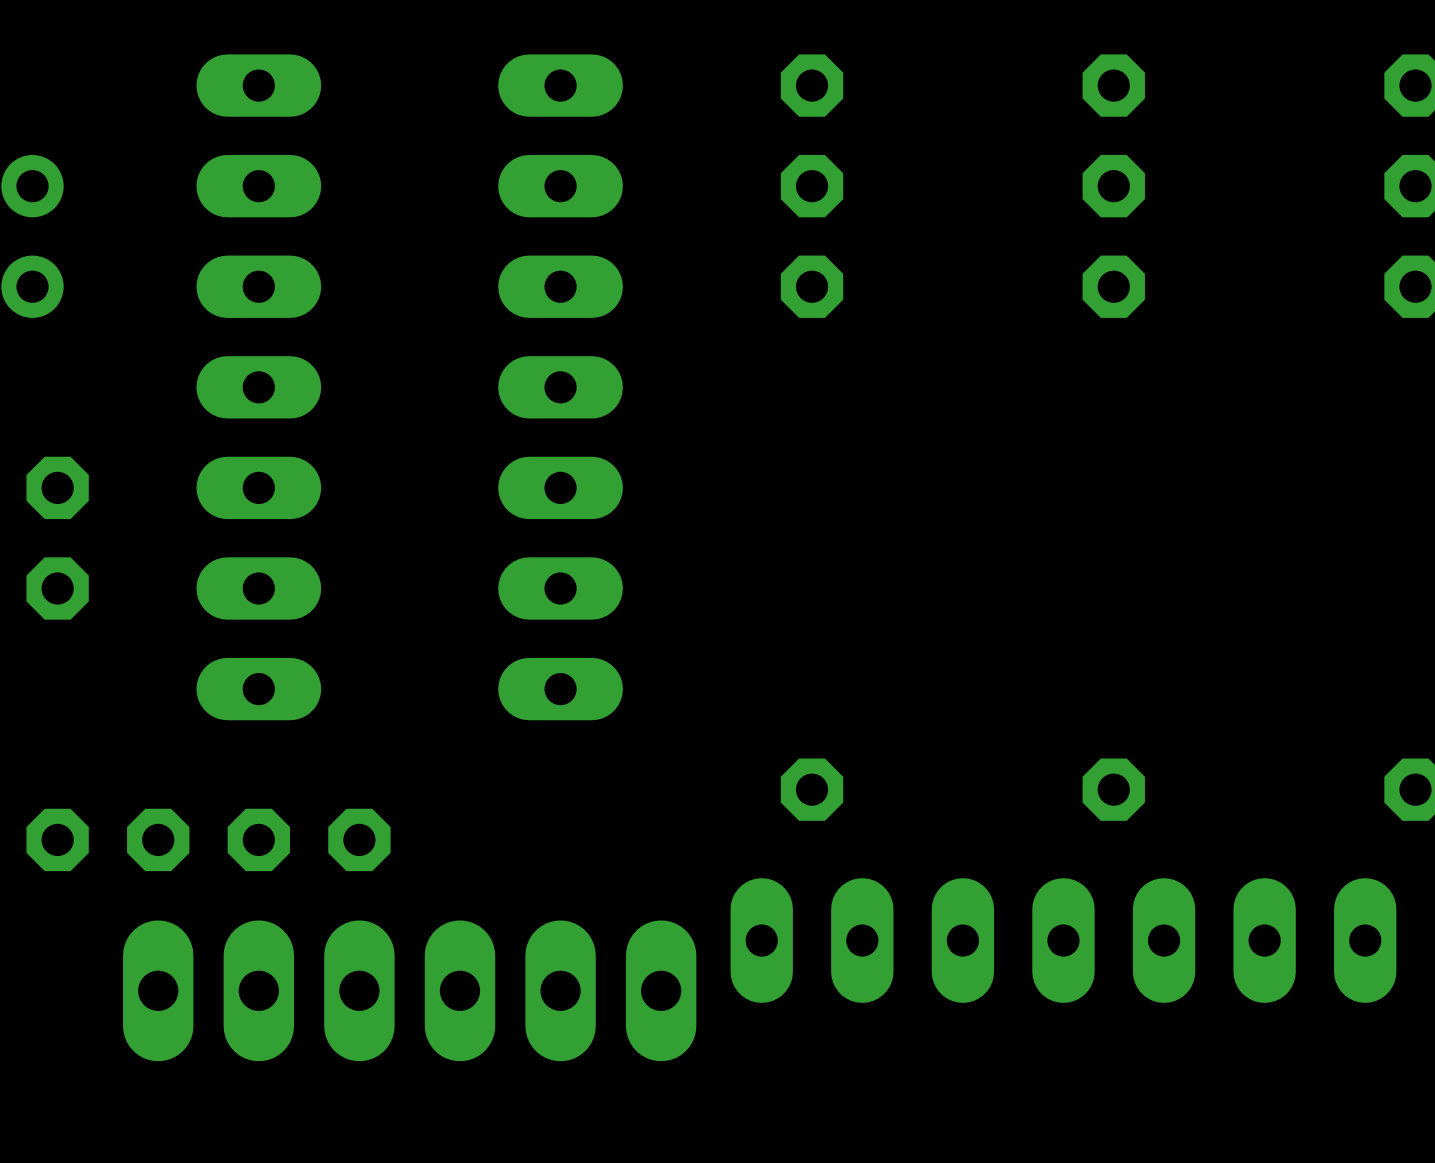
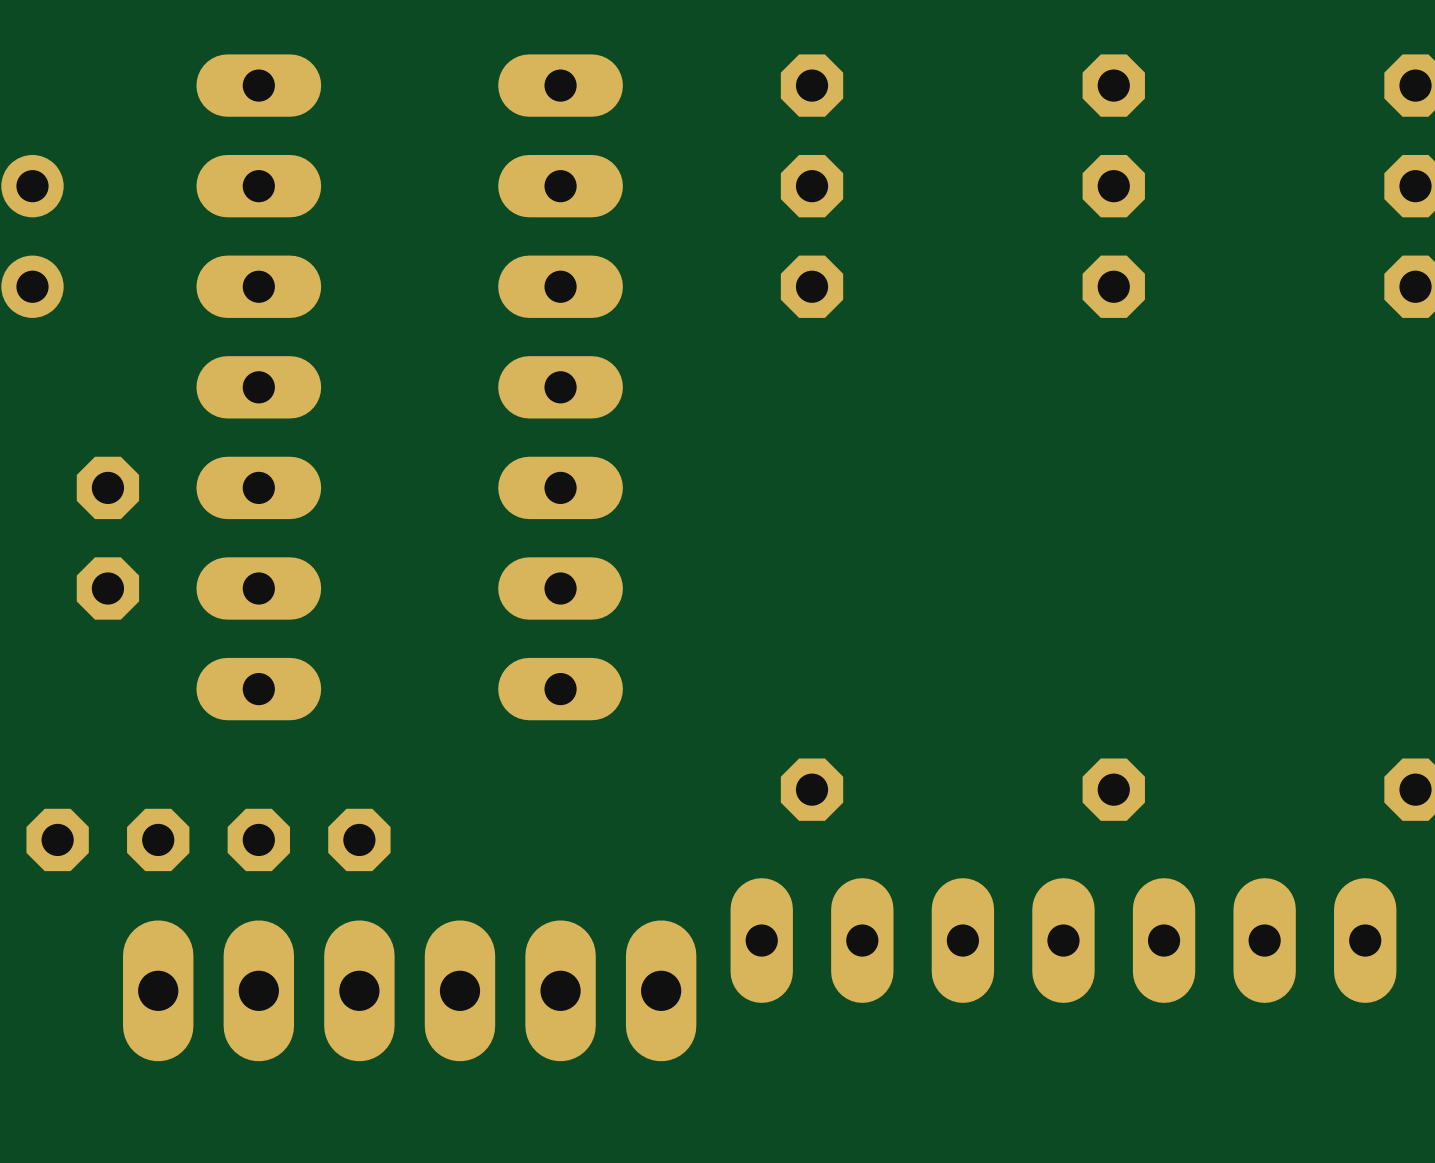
part position: (57, 538) -> (107, 538)

